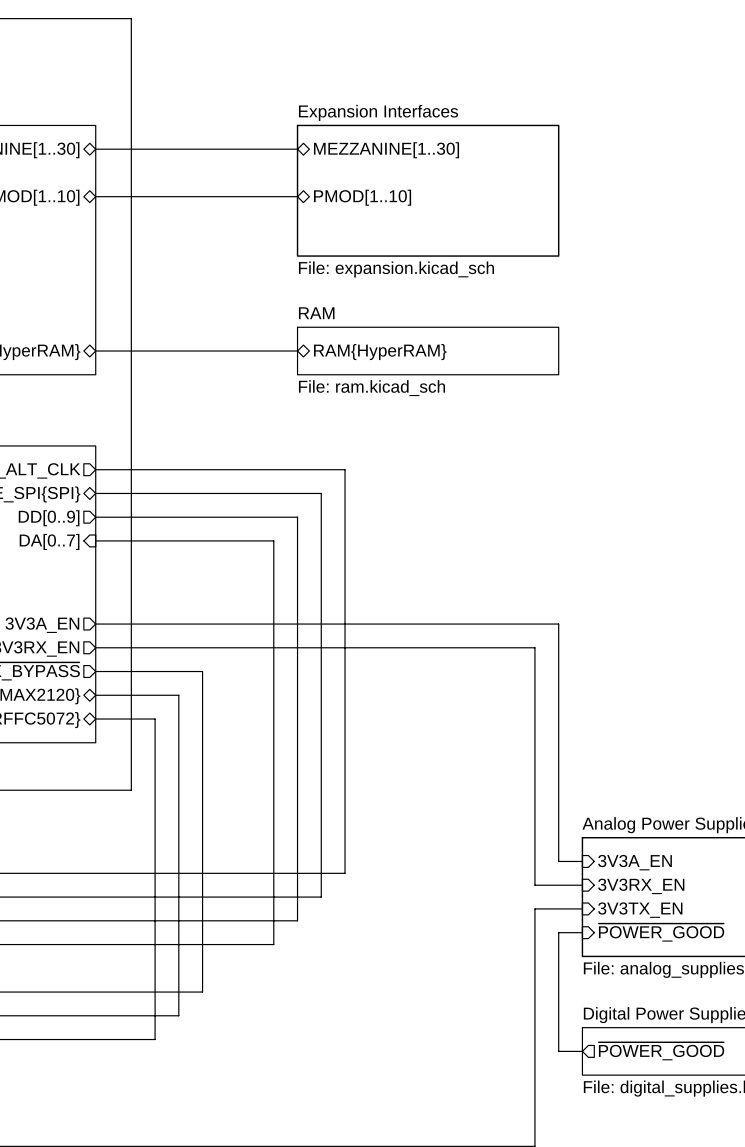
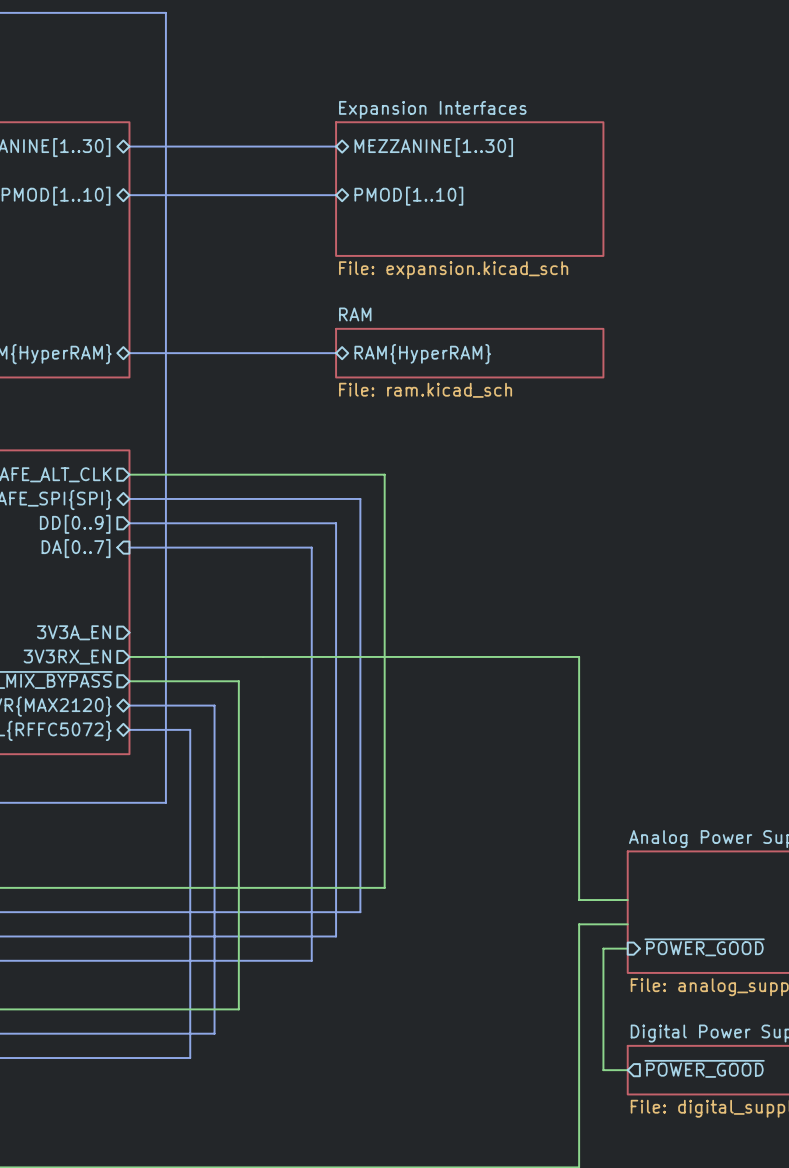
wire: (95, 624) (558, 624) (558, 861) (582, 861) -> none
sheet pin: 3V3A_EN (635, 862) -> none
sheet pin: 3V3RX_EN (641, 886) -> none
sheet pin: 3V3TX_EN (640, 910) -> none

